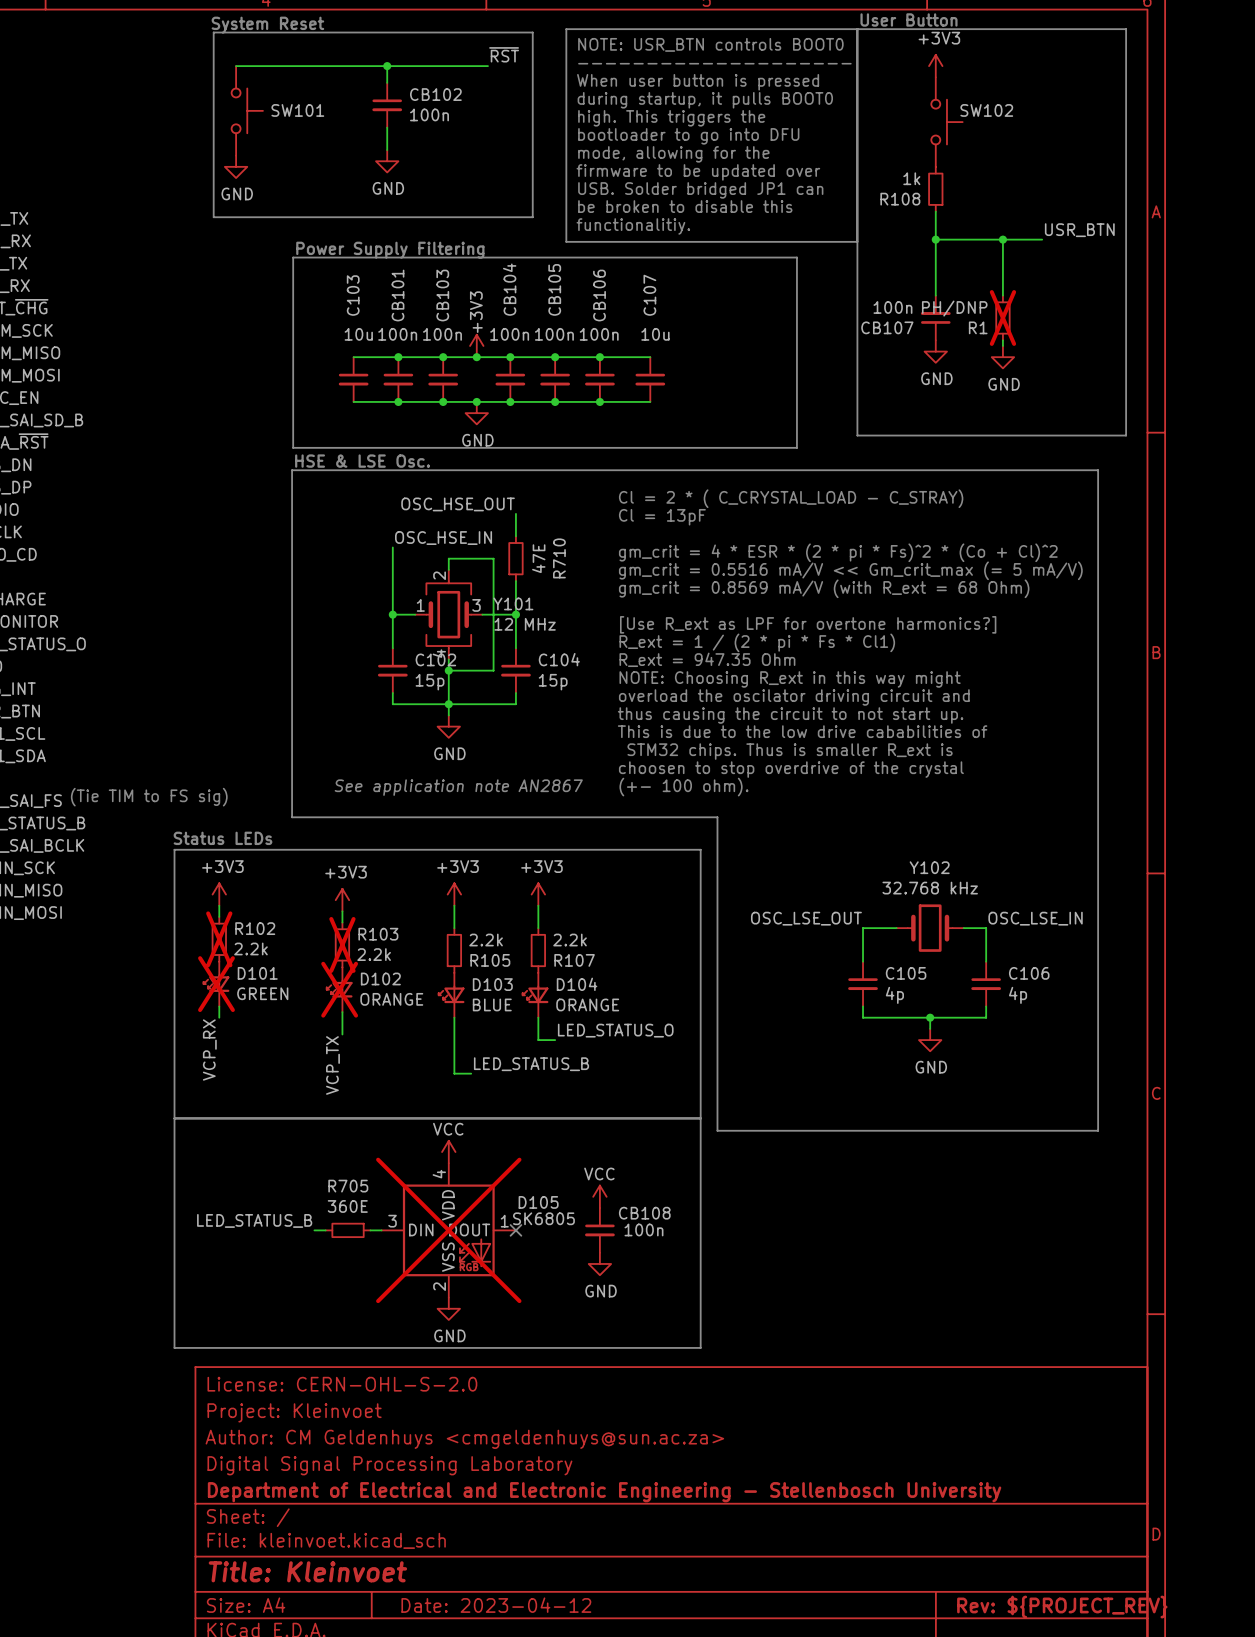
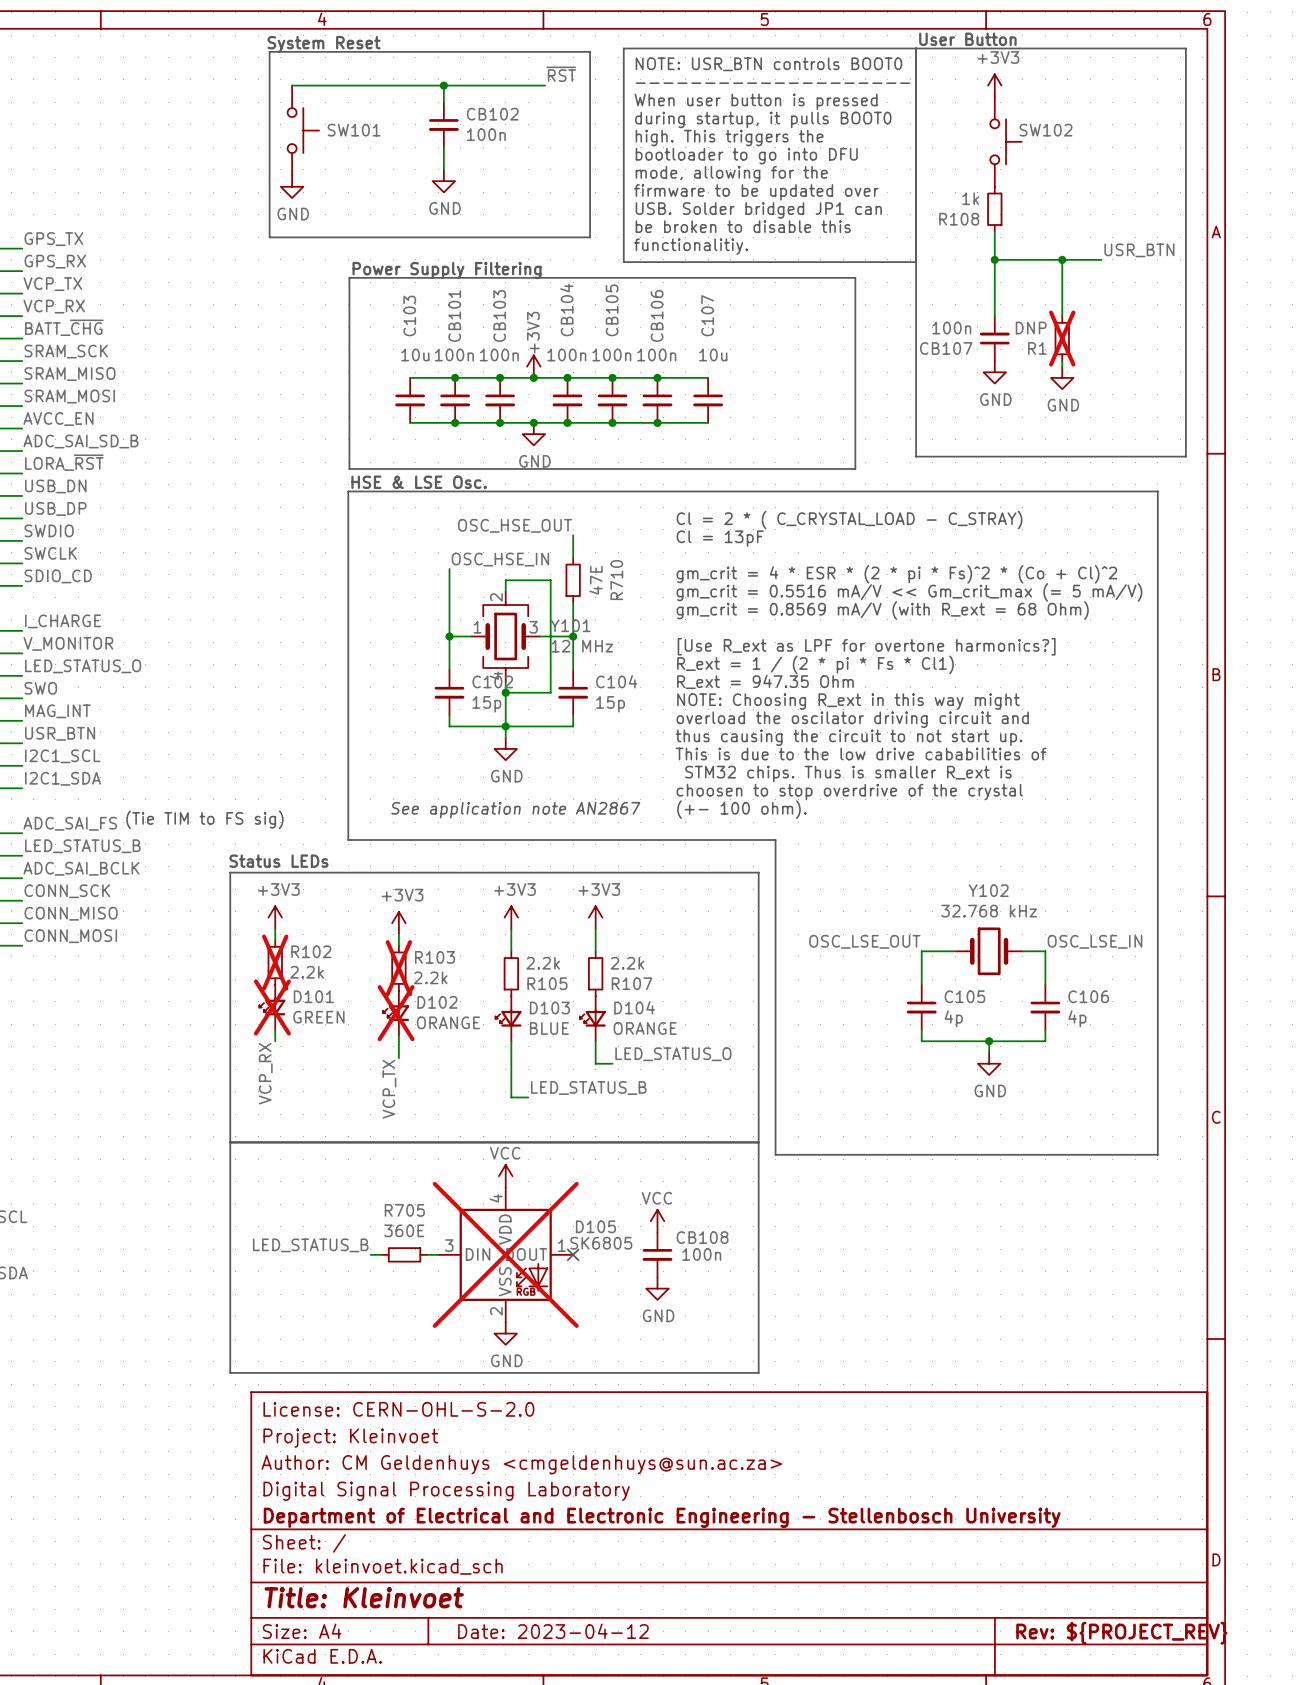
R1 value: PH/DNP (954, 308) -> DNP (1031, 328)

